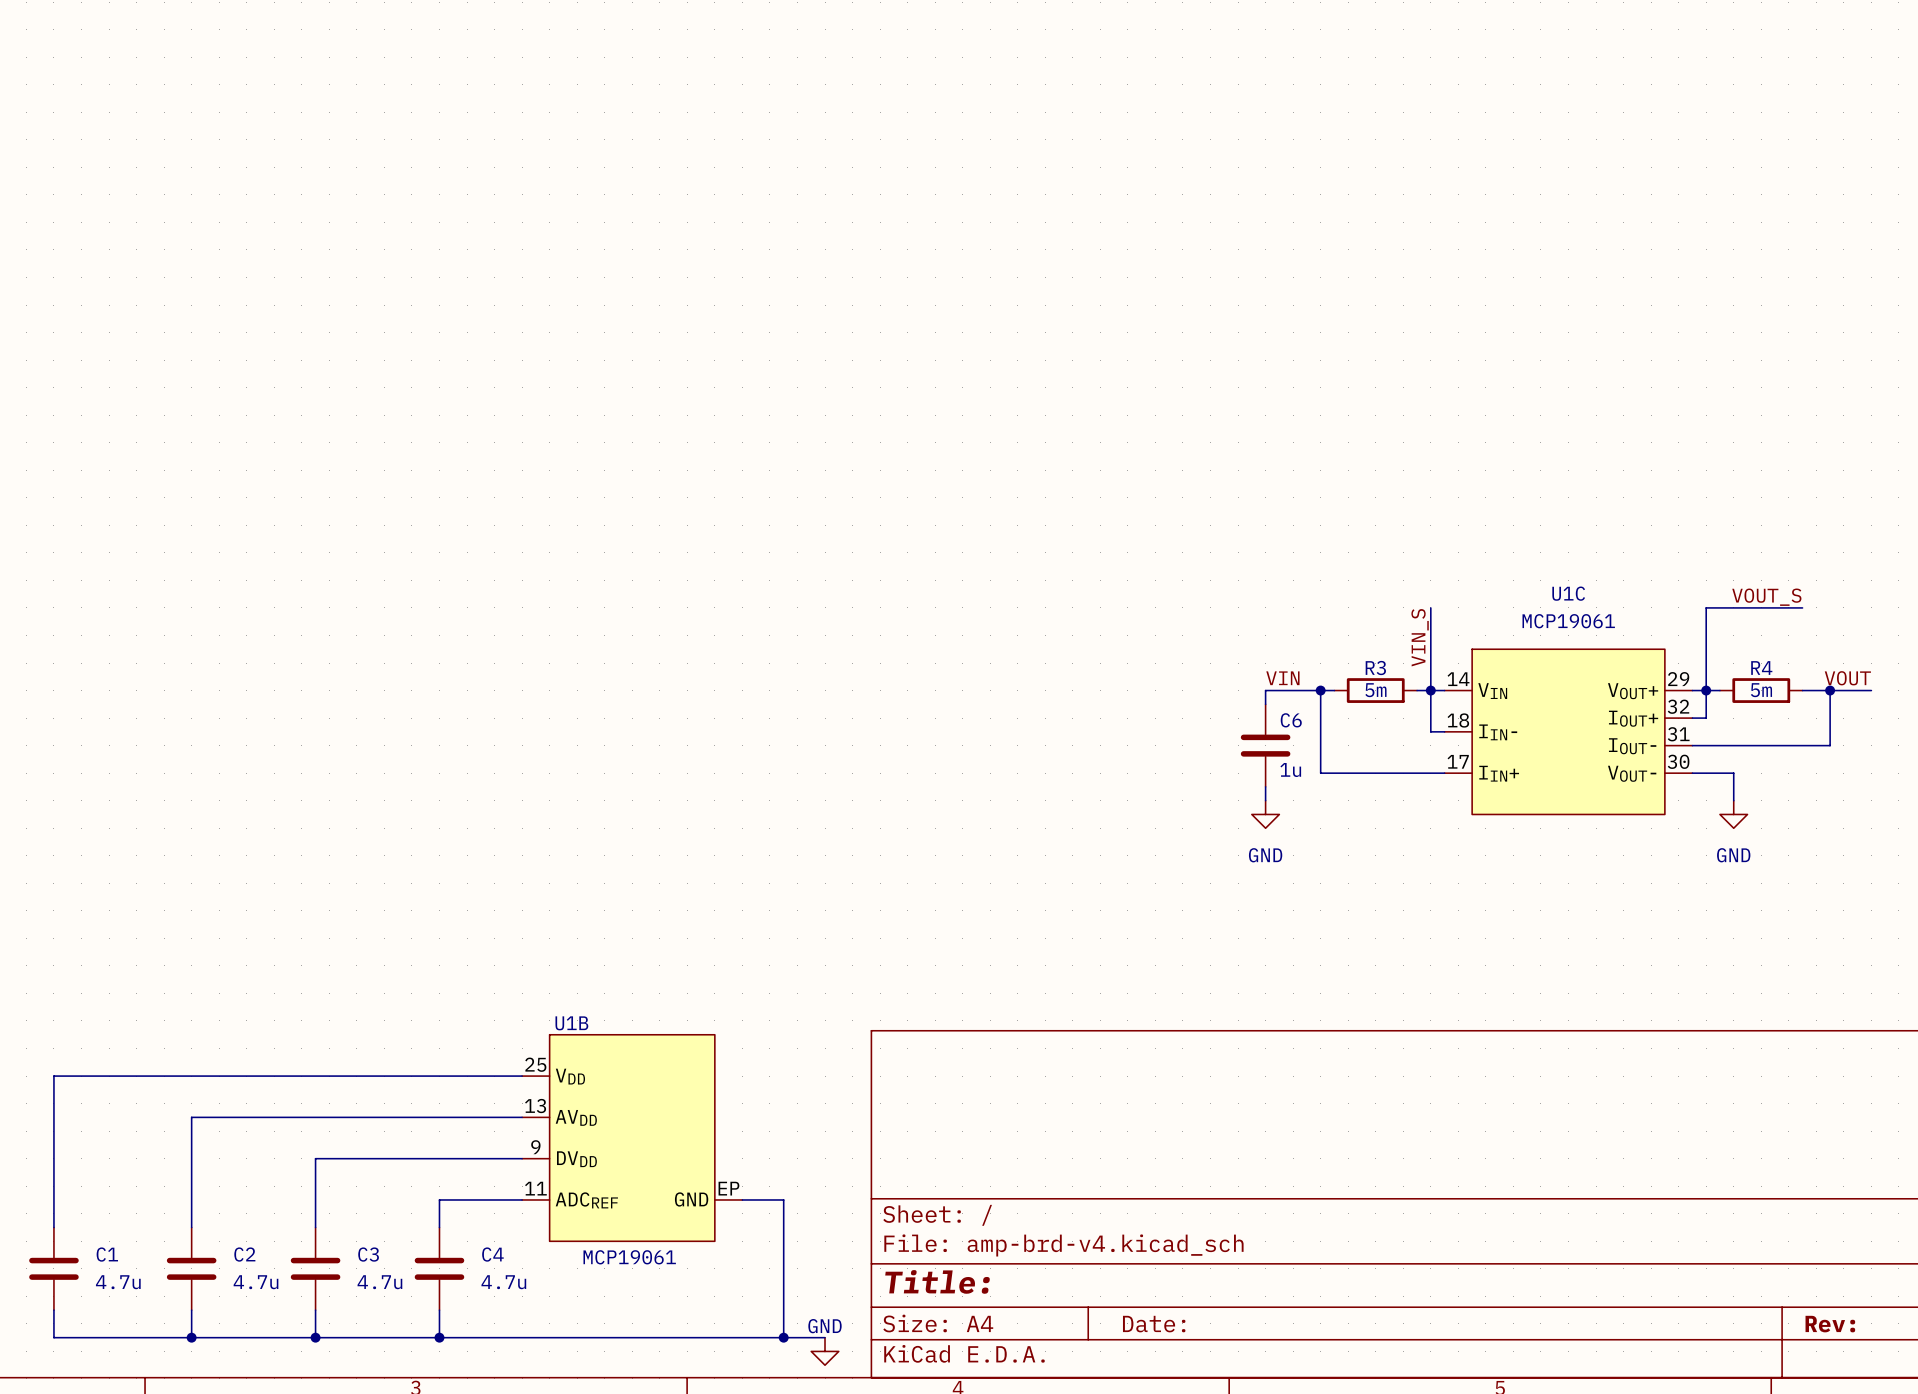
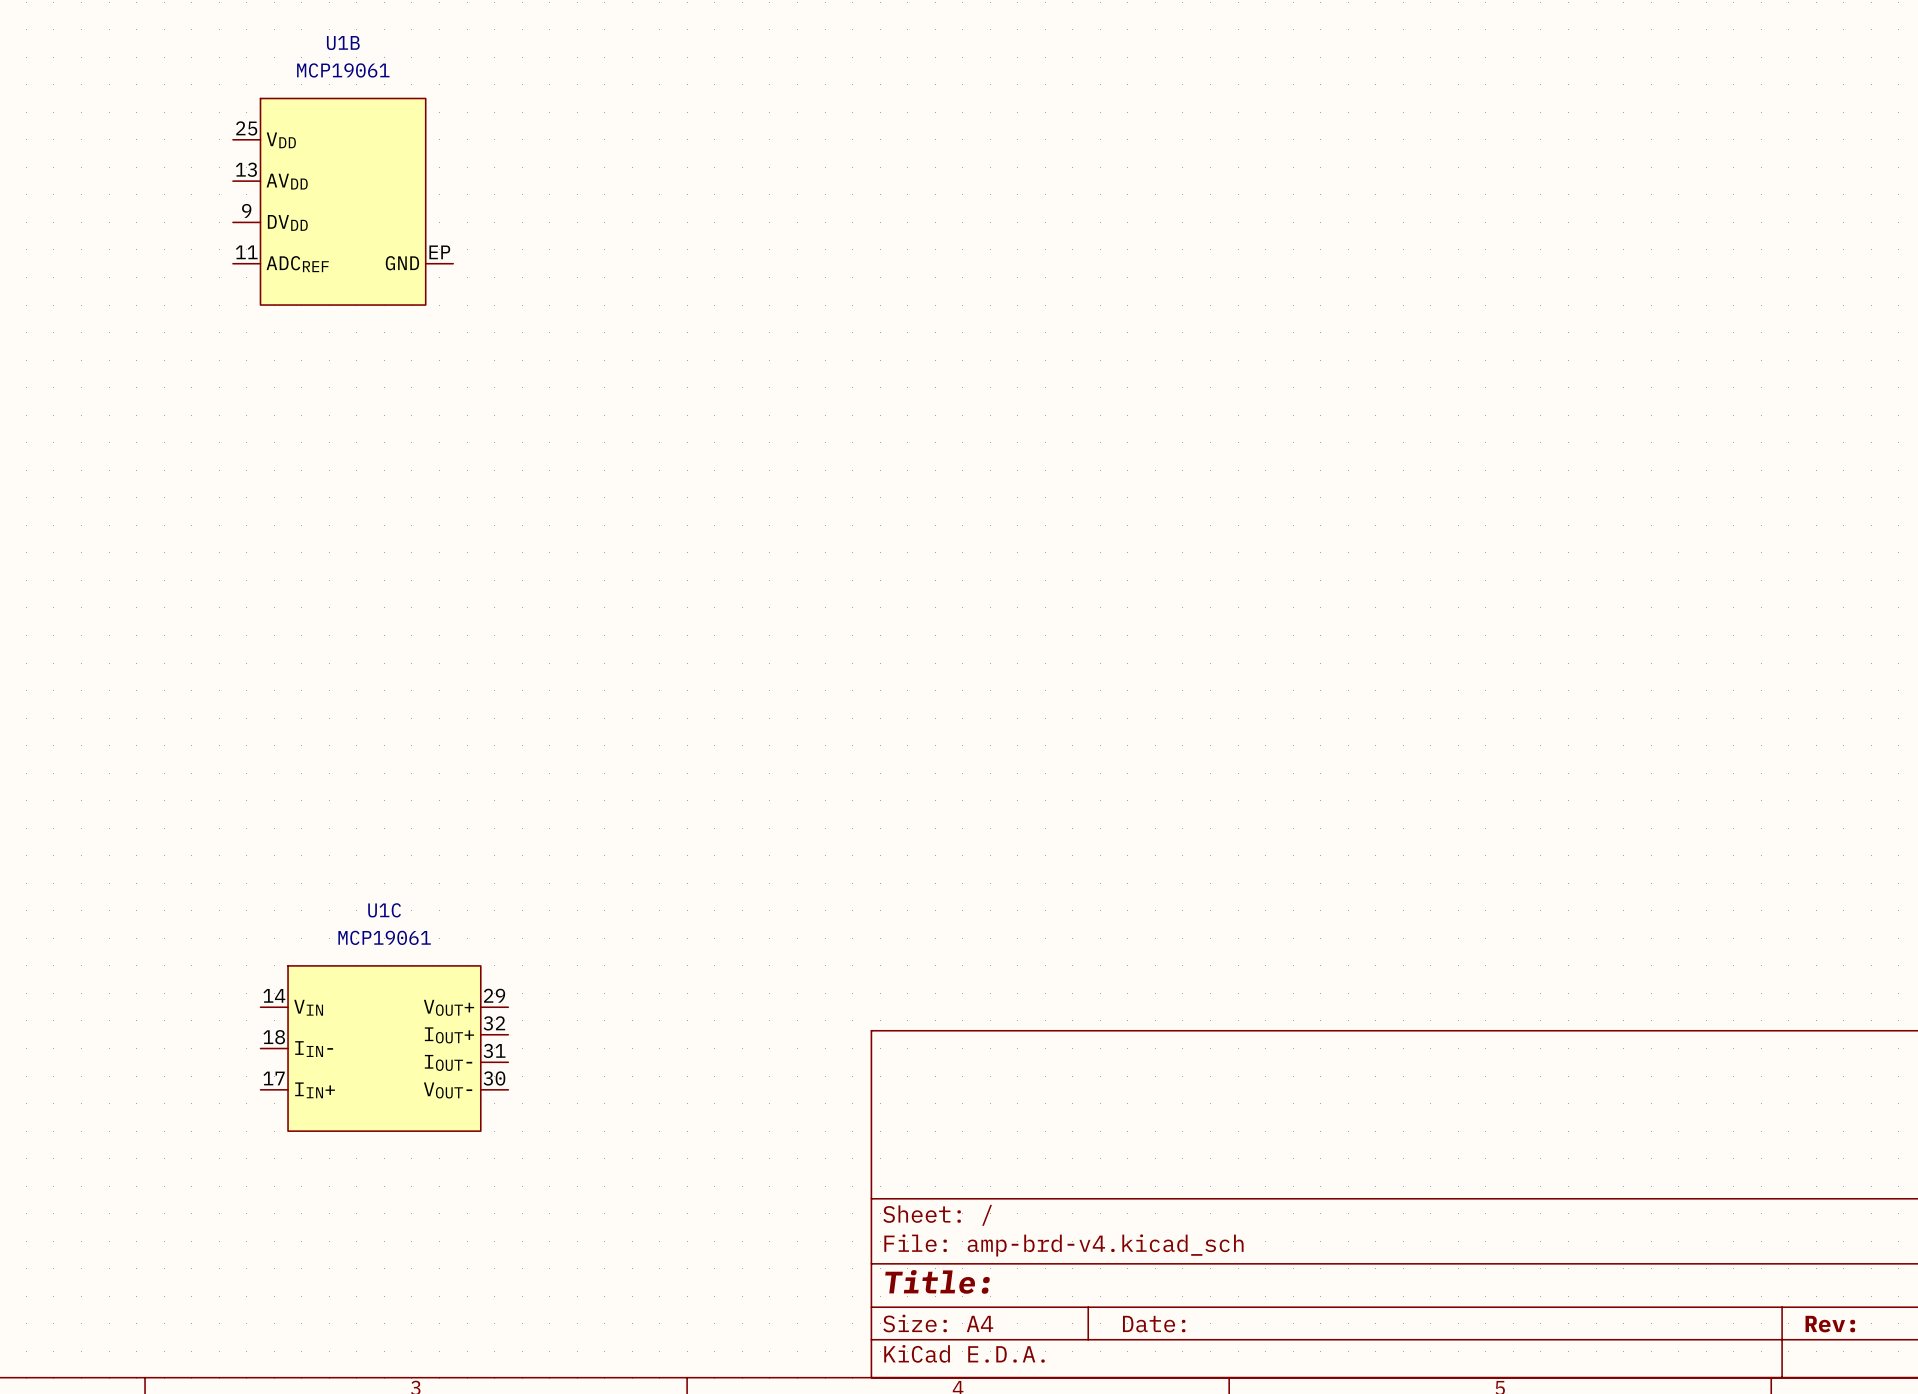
label: VOUT_S (1766, 597) -> none
wire: (1430, 607) (1430, 731) (1444, 731) -> none
wire: (1802, 607) (1706, 607) (1706, 718) (1692, 718) -> none
label: VIN_S (1420, 637) -> none
label: VIN (1282, 678) -> none
label: VOUT (1847, 678) -> none
wire: (1320, 690) (1320, 773) (1444, 773) -> none
junction: (1320, 690) -> none
wire: (1334, 690) (1265, 690) (1265, 704) -> none
R3: 5m (1375, 690) -> none
wire: (1417, 690) (1444, 690) -> none
junction: (1430, 690) -> none
wire: (1692, 690) (1719, 690) -> none
junction: (1706, 690) -> none
R4: 5m (1761, 690) -> none
wire: (1802, 690) (1871, 690) -> none
wire: (1830, 690) (1830, 745) (1692, 745) -> none
junction: (1830, 690) -> none
U1C position: (1568, 731) -> (384, 1048)
C6: 1u (1265, 745) -> none
wire: (1692, 773) (1733, 773) (1733, 800) -> none
wire: (1265, 786) (1265, 800) -> none
power symbol: GND (1265, 814) -> none
power symbol: GND (1733, 814) -> none
U1B name position: U1B (571, 1023) -> U1B (343, 43)
wire: (522, 1076) (53, 1076) (53, 1227) -> none
wire: (522, 1117) (191, 1117) (191, 1227) -> none
U1B position: (632, 1138) -> (343, 201)
wire: (522, 1158) (315, 1158) (315, 1227) -> none
wire: (522, 1199) (439, 1199) (439, 1227) -> none
wire: (742, 1199) (783, 1199) (783, 1337) -> none
U1B value position: MCP19061 (629, 1257) -> MCP19061 (343, 70)
C1: 4.7u (53, 1268) -> none
C2: 4.7u (191, 1268) -> none
C3: 4.7u (315, 1268) -> none
C4: 4.7u (439, 1268) -> none
wire: (53, 1310) (53, 1337) (825, 1337) -> none
wire: (191, 1310) (191, 1337) -> none
wire: (315, 1310) (315, 1337) -> none
wire: (439, 1310) (439, 1337) -> none
junction: (191, 1337) -> none
junction: (315, 1337) -> none
junction: (439, 1337) -> none
junction: (783, 1337) -> none
power symbol: GND (825, 1351) -> none

